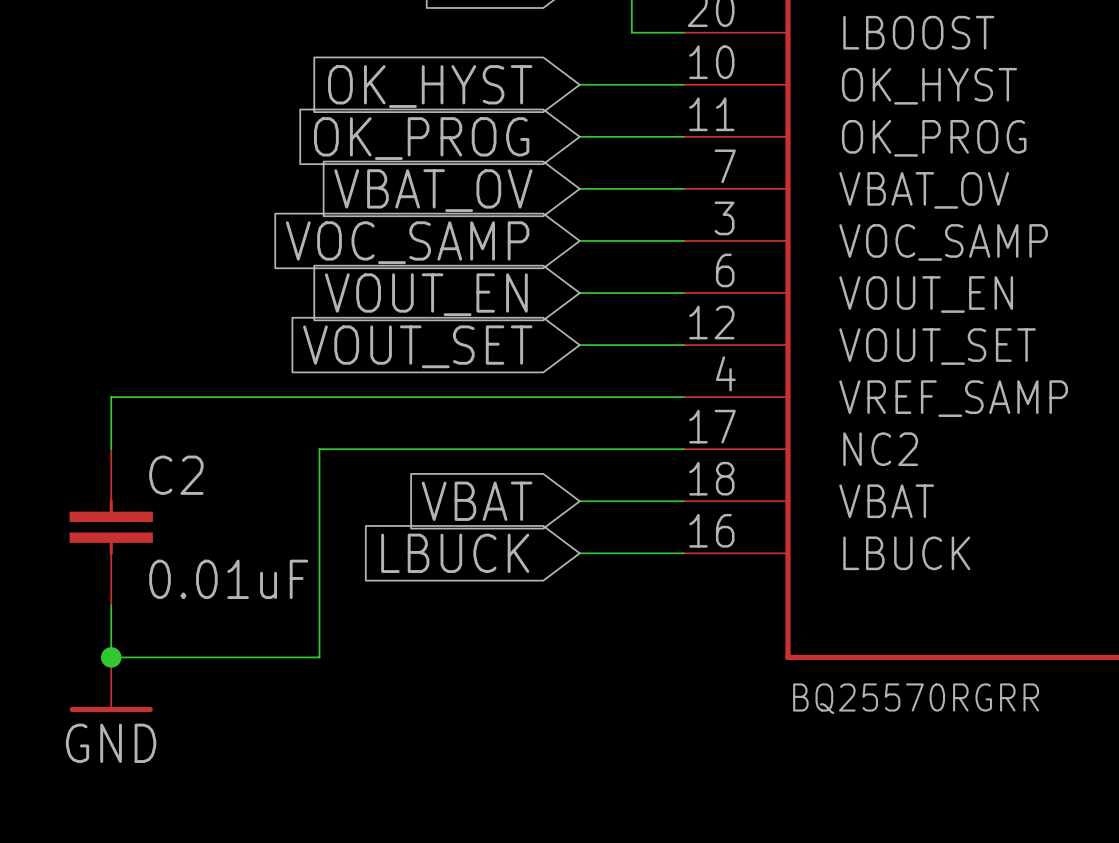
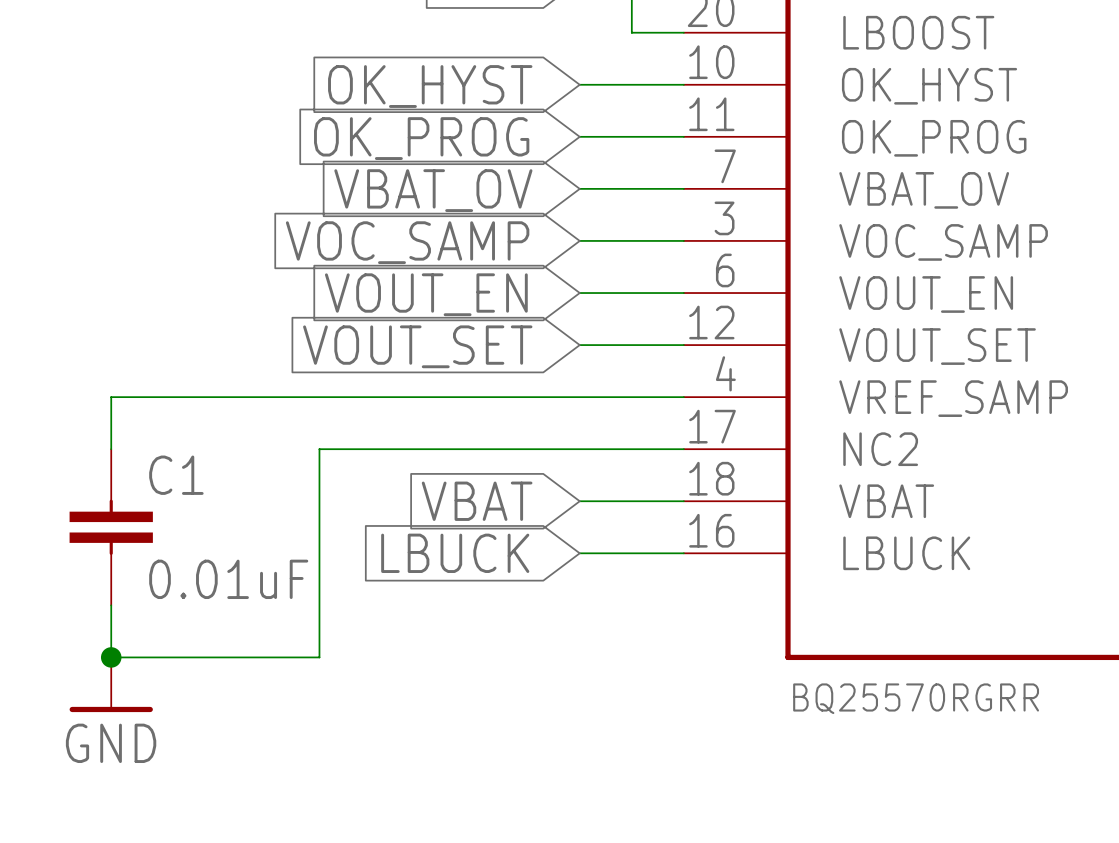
C2 name: C2 (176, 475) -> C1 (176, 475)

